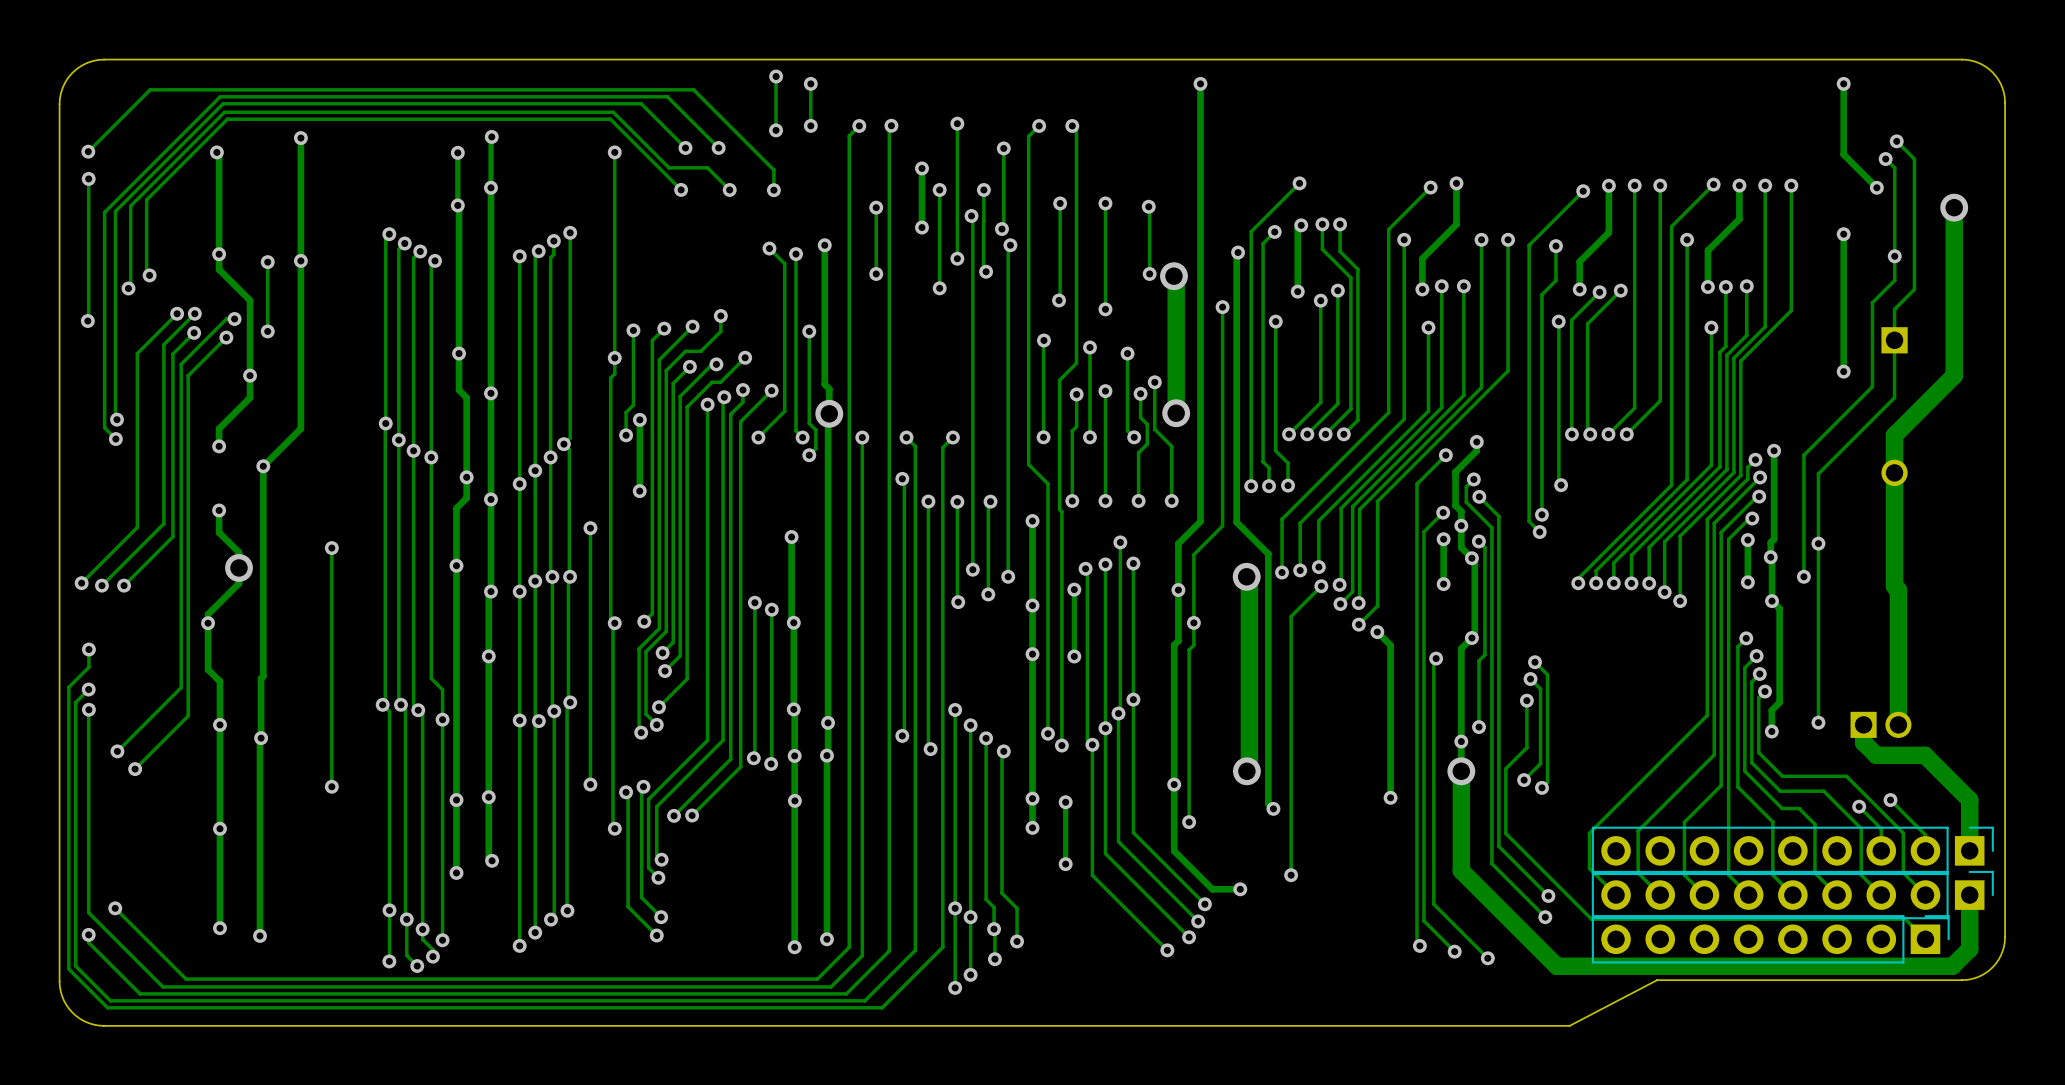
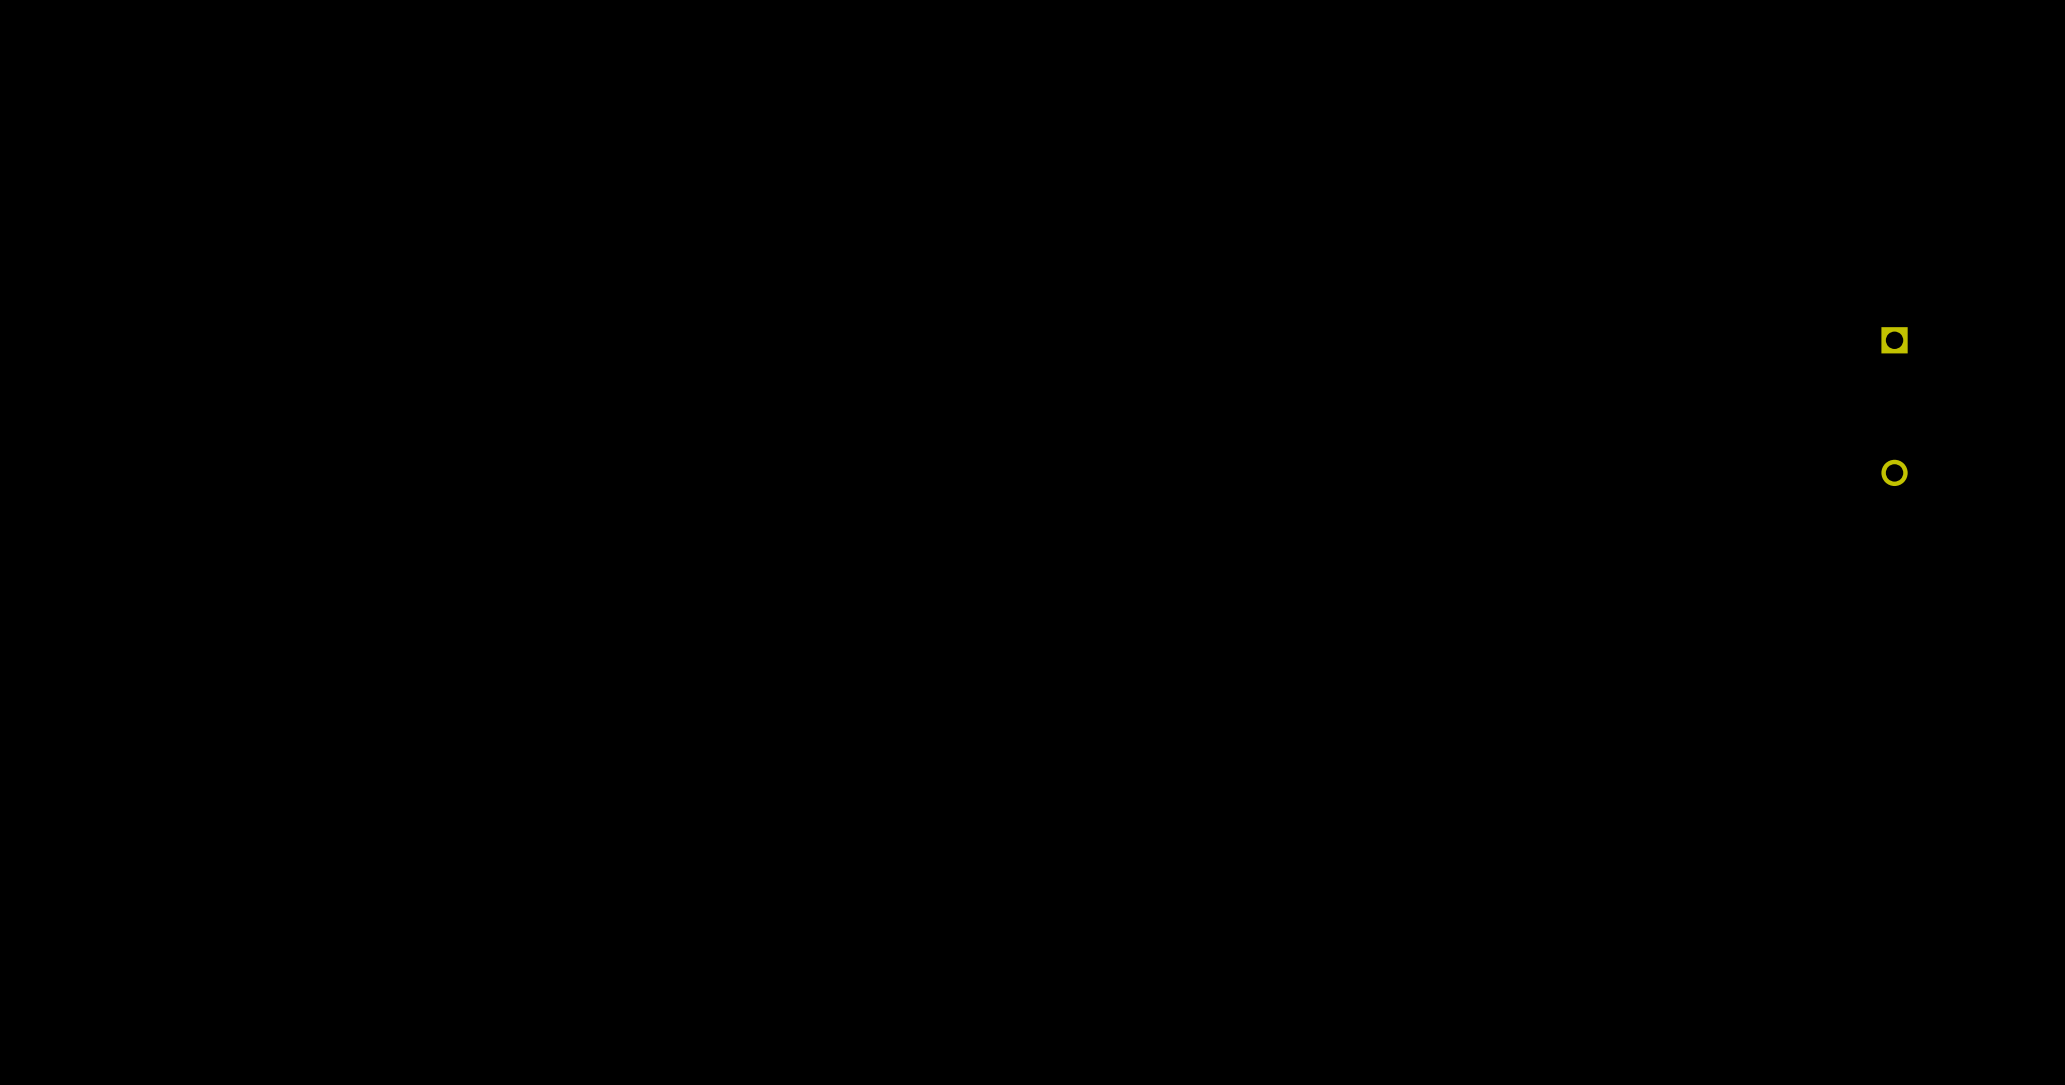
board edge: (1961, 59) (104, 59) (92, 61) (81, 65) (72, 72) (65, 81) (61, 92) (59, 104) (59, 981) (63, 1000) (69, 1009) (80, 1019) (94, 1024) (104, 1025) (1569, 1025) (1657, 980) (1961, 980) (1980, 975) (1988, 970) (1998, 960) (2003, 946) (2005, 937) (2005, 102) (2000, 83) (1992, 72) (1980, 63) (1961, 59) -> none
track: (776, 76) (776, 130) -> none
via: (776, 76) -> none
track: (810, 83) (810, 125) -> none
via: (810, 83) -> none
track: (1200, 83) (1200, 521) (1178, 543) (1178, 640) (1174, 645) (1174, 851) (1212, 889) (1240, 889) -> none
via: (1200, 83) -> none
track: (1843, 83) (1843, 154) (1876, 187) -> none
via: (1843, 83) -> none
track: (957, 123) (957, 258) -> none
via: (957, 123) -> none
via: (810, 125) -> none
track: (859, 125) (849, 136) (849, 947) (817, 979) (185, 979) (115, 908) -> none
via: (859, 125) -> none
track: (891, 125) (889, 127) (889, 951) (846, 993) (139, 993) (88, 942) (88, 934) -> none
via: (891, 125) -> none
track: (1039, 125) (1028, 136) (1028, 464) (1047, 483) (1047, 733) -> none
via: (1039, 125) -> none
track: (1072, 125) (1076, 130) (1076, 363) (1059, 380) (1061, 745) -> none
via: (1072, 125) -> none
via: (776, 130) -> none
track: (491, 136) (488, 857) (492, 860) -> none
via: (491, 136) -> none
track: (300, 138) (300, 428) (263, 466) (260, 935) -> none
via: (300, 138) -> none
track: (1896, 141) (1914, 159) (1914, 289) (1894, 309) (1894, 397) (1818, 473) (1818, 722) -> none
via: (1896, 141) -> none
track: (685, 147) (641, 103) (223, 103) (115, 211) (115, 418) (117, 419) -> none
via: (685, 147) -> none
track: (718, 147) (667, 96) (220, 96) (104, 212) (104, 427) (115, 439) -> none
via: (718, 147) -> none
track: (1003, 148) (1003, 227) (1001, 229) -> none
via: (1003, 148) -> none
track: (88, 151) (150, 89) (693, 89) (773, 170) (773, 190) -> none
via: (88, 151) -> none
track: (216, 152) (219, 154) (219, 269) (250, 300) (250, 397) (219, 428) (219, 446) -> none
via: (216, 152) -> none
track: (457, 152) (459, 390) (466, 397) (466, 498) (456, 508) (456, 872) -> none
via: (457, 152) -> none
track: (614, 152) (614, 373) (610, 377) (610, 619) (614, 623) (613, 624) (613, 826) (614, 828) -> none
via: (614, 152) -> none
track: (1885, 159) (1894, 168) (1894, 280) (1872, 302) (1872, 386) (1803, 455) (1803, 576) -> none
via: (1885, 159) -> none
track: (922, 168) (922, 227) -> none
via: (922, 168) -> none
track: (88, 178) (87, 321) -> none
via: (88, 178) -> none
track: (1299, 183) (1251, 231) (1251, 486) -> none
via: (1299, 183) -> none
track: (1456, 183) (1456, 224) (1422, 258) (1422, 289) -> none
via: (1456, 183) -> none
track: (1713, 184) (1671, 226) (1671, 485) (1578, 578) (1578, 583) -> none
via: (1713, 184) -> none
track: (1608, 185) (1608, 232) (1579, 261) (1579, 289) -> none
via: (1608, 185) -> none
track: (1634, 185) (1634, 408) (1608, 434) -> none
via: (1634, 185) -> none
track: (1660, 185) (1660, 400) (1626, 434) -> none
via: (1660, 185) -> none
track: (1739, 185) (1739, 219) (1707, 250) (1707, 287) -> none
via: (1739, 185) -> none
track: (1765, 185) (1765, 326) (1733, 358) (1733, 472) (1664, 541) (1664, 592) -> none
via: (1765, 185) -> none
track: (1791, 185) (1791, 310) (1740, 361) (1740, 475) (1680, 536) (1680, 601) -> none
via: (1791, 185) -> none
via: (490, 187) -> none
track: (1430, 187) (1388, 229) (1388, 412) (1282, 519) (1282, 572) -> none
via: (1430, 187) -> none
via: (1876, 187) -> none
track: (681, 189) (610, 119) (227, 119) (146, 199) (146, 272) (149, 275) -> none
via: (681, 189) -> none
track: (729, 189) (707, 167) (668, 167) (613, 112) (224, 112) (130, 206) (130, 286) (128, 288) -> none
via: (729, 189) -> none
track: (939, 189) (939, 288) -> none
via: (939, 189) -> none
track: (983, 189) (983, 269) (986, 271) -> none
via: (983, 189) -> none
via: (773, 190) -> none
track: (1583, 191) (1529, 245) (1529, 521) (1539, 532) -> none
via: (1583, 191) -> none
track: (1060, 203) (1059, 300) -> none
via: (1060, 203) -> none
track: (1105, 203) (1105, 309) -> none
via: (1105, 203) -> none
via: (457, 205) -> none
track: (1148, 206) (1149, 273) -> none
via: (1148, 206) -> none
track: (876, 207) (876, 273) -> none
via: (876, 207) -> none
track: (1954, 207) (1954, 375) (1894, 435) (1894, 586) (1898, 590) (1898, 724) -> none
via: (1954, 207) -> none
track: (971, 215) (972, 569) -> none
via: (971, 215) -> none
track: (1322, 224) (1322, 249) (1350, 277) (1350, 408) (1325, 434) -> none
via: (1322, 224) -> none
track: (1340, 224) (1340, 251) (1357, 269) (1357, 420) (1343, 434) -> none
via: (1340, 224) -> none
track: (1301, 225) (1297, 228) (1297, 291) -> none
via: (1301, 225) -> none
via: (922, 227) -> none
via: (1001, 229) -> none
track: (1274, 231) (1263, 243) (1263, 461) (1269, 467) (1269, 486) -> none
via: (1274, 231) -> none
track: (570, 232) (570, 437) (563, 444) (569, 449) (568, 700) (570, 702) (567, 705) (567, 910) -> none
via: (570, 232) -> none
track: (389, 234) (385, 237) (385, 702) (382, 704) (389, 711) (389, 961) -> none
via: (389, 234) -> none
track: (1843, 234) (1843, 371) -> none
via: (1843, 234) -> none
track: (1404, 239) (1404, 419) (1300, 523) (1300, 570) -> none
via: (1404, 239) -> none
track: (1481, 239) (1481, 387) (1359, 509) (1358, 603) -> none
via: (1481, 239) -> none
track: (1508, 239) (1508, 370) (1377, 501) (1377, 605) (1358, 624) -> none
via: (1508, 239) -> none
track: (1687, 239) (1687, 479) (1596, 570) (1596, 583) -> none
via: (1687, 239) -> none
track: (553, 241) (553, 254) (550, 257) (550, 575) (552, 576) (552, 709) (554, 711) (554, 916) (550, 919) -> none
via: (553, 241) -> none
track: (404, 243) (398, 249) (398, 702) (405, 709) (406, 955) (417, 966) -> none
via: (404, 243) -> none
track: (824, 245) (824, 384) (829, 389) (826, 939) -> none
via: (824, 245) -> none
track: (1010, 245) (1008, 247) (1008, 576) -> none
via: (1010, 245) -> none
track: (1555, 246) (1555, 280) (1541, 294) (1541, 514) -> none
via: (1555, 246) -> none
track: (769, 248) (784, 263) (784, 411) (758, 437) -> none
via: (769, 248) -> none
track: (420, 251) (413, 258) (413, 705) (422, 714) (422, 939) (432, 949) (432, 956) -> none
via: (420, 251) -> none
track: (538, 251) (535, 254) (535, 717) (538, 721) (535, 724) (535, 932) -> none
via: (538, 251) -> none
track: (1238, 252) (1236, 522) (1268, 553) (1268, 803) (1273, 808) -> none
via: (1238, 252) -> none
via: (219, 254) -> none
track: (796, 254) (796, 430) (802, 437) -> none
via: (796, 254) -> none
track: (519, 256) (519, 945) -> none
via: (519, 256) -> none
via: (1894, 256) -> none
via: (957, 258) -> none
via: (300, 260) -> none
track: (435, 260) (431, 264) (431, 678) (442, 689) (442, 719) -> none
via: (435, 260) -> none
track: (267, 262) (267, 331) -> none
via: (267, 262) -> none
via: (986, 271) -> none
via: (876, 273) -> none
via: (1149, 273) -> none
via: (149, 275) -> none
track: (1173, 276) (1176, 278) (1176, 413) -> none
via: (1173, 276) -> none
track: (1441, 286) (1441, 407) (1341, 508) (1341, 583) (1339, 584) -> none
via: (1441, 286) -> none
track: (1463, 286) (1463, 395) (1352, 506) (1352, 591) (1340, 604) -> none
via: (1463, 286) -> none
track: (1746, 286) (1746, 335) (1726, 355) (1726, 469) (1649, 547) (1649, 583) -> none
via: (1746, 286) -> none
via: (1707, 287) -> none
track: (1725, 287) (1725, 346) (1719, 352) (1719, 466) (1631, 555) (1631, 583) -> none
via: (1725, 287) -> none
via: (128, 288) -> none
via: (939, 288) -> none
via: (1422, 289) -> none
via: (1579, 289) -> none
track: (1337, 290) (1337, 403) (1307, 434) -> none
via: (1337, 290) -> none
track: (1620, 290) (1587, 323) (1587, 431) (1590, 434) -> none
via: (1620, 290) -> none
via: (1297, 291) -> none
track: (1599, 292) (1571, 320) (1571, 434) -> none
via: (1599, 292) -> none
via: (1059, 300) -> none
track: (1320, 300) (1320, 402) (1289, 434) -> none
via: (1320, 300) -> none
track: (1222, 307) (1222, 525) (1193, 554) (1193, 645) (1189, 650) (1189, 822) -> none
via: (1222, 307) -> none
via: (1105, 309) -> none
track: (177, 313) (137, 353) (137, 527) (81, 583) -> none
via: (177, 313) -> none
track: (194, 313) (163, 344) (163, 523) (101, 585) -> none
via: (194, 313) -> none
track: (720, 315) (720, 331) (700, 351) (685, 351) (666, 370) (666, 631) (646, 651) (646, 714) (656, 724) -> none
via: (720, 315) -> none
track: (234, 319) (226, 319) (181, 364) (181, 687) (117, 751) -> none
via: (234, 319) -> none
via: (87, 321) -> none
track: (1275, 321) (1275, 450) (1288, 463) (1288, 485) -> none
via: (1275, 321) -> none
track: (1558, 321) (1558, 482) (1561, 485) -> none
via: (1558, 321) -> none
track: (692, 326) (659, 359) (659, 628) (639, 648) (639, 730) (641, 732) -> none
via: (692, 326) -> none
track: (1428, 327) (1428, 411) (1318, 520) (1318, 567) -> none
via: (1428, 327) -> none
track: (1711, 327) (1711, 465) (1613, 562) (1613, 583) -> none
via: (1711, 327) -> none
track: (664, 328) (652, 340) (652, 613) (644, 621) -> none
via: (664, 328) -> none
track: (633, 330) (633, 405) (626, 412) (626, 435) -> none
via: (633, 330) -> none
via: (267, 331) -> none
track: (809, 331) (809, 423) (815, 430) (815, 448) (809, 455) -> none
via: (809, 331) -> none
track: (194, 332) (172, 354) (172, 536) (124, 585) -> none
via: (194, 332) -> none
track: (226, 337) (188, 375) (188, 716) (135, 769) -> none
via: (226, 337) -> none
track: (1043, 340) (1043, 437) -> none
via: (1043, 340) -> none
track: (1089, 347) (1089, 437) -> none
via: (1089, 347) -> none
via: (459, 353) -> none
track: (1127, 353) (1127, 430) (1134, 437) -> none
via: (1127, 353) -> none
via: (614, 357) -> none
track: (745, 357) (720, 382) (712, 382) (687, 407) (687, 679) (658, 707) -> none
via: (745, 357) -> none
track: (716, 364) (712, 364) (680, 396) (680, 655) (665, 671) -> none
via: (716, 364) -> none
track: (689, 366) (673, 383) (673, 642) (662, 652) -> none
via: (689, 366) -> none
via: (1843, 371) -> none
via: (250, 375) -> none
track: (1154, 382) (1154, 429) (1171, 446) (1171, 501) -> none
via: (1154, 382) -> none
track: (742, 390) (742, 402) (730, 414) (730, 759) (674, 815) -> none
via: (742, 390) -> none
track: (771, 390) (740, 421) (740, 766) (692, 815) -> none
via: (771, 390) -> none
track: (1105, 391) (1105, 501) -> none
via: (1105, 391) -> none
via: (490, 393) -> none
track: (1140, 393) (1140, 417) (1147, 424) (1147, 444) (1138, 452) (1138, 501) -> none
via: (1140, 393) -> none
track: (1076, 394) (1076, 426) (1072, 430) (1072, 501) -> none
via: (1076, 394) -> none
track: (724, 397) (723, 740) (656, 806) (656, 854) (661, 859) -> none
via: (724, 397) -> none
track: (707, 404) (707, 740) (648, 799) (648, 867) (658, 877) -> none
via: (707, 404) -> none
via: (829, 413) -> none
via: (1176, 413) -> none
via: (117, 419) -> none
track: (639, 419) (639, 490) -> none
via: (639, 419) -> none
via: (385, 423) -> none
via: (1289, 434) -> none
via: (1307, 434) -> none
via: (1325, 434) -> none
via: (1343, 434) -> none
via: (1571, 434) -> none
via: (1590, 434) -> none
via: (1608, 434) -> none
via: (1626, 434) -> none
via: (626, 435) -> none
via: (758, 437) -> none
via: (802, 437) -> none
track: (862, 437) (862, 955) (831, 986) (162, 986) (88, 912) (88, 709) -> none
via: (862, 437) -> none
track: (906, 437) (915, 446) (915, 950) (864, 1000) (110, 1000) (75, 966) (75, 702) (88, 689) -> none
via: (906, 437) -> none
track: (952, 437) (942, 447) (942, 947) (882, 1007) (107, 1007) (68, 969) (68, 687) (88, 667) (88, 649) -> none
via: (952, 437) -> none
via: (1043, 437) -> none
via: (1089, 437) -> none
via: (1134, 437) -> none
via: (115, 439) -> none
via: (398, 440) -> none
track: (1476, 441) (1476, 450) (1455, 472) (1455, 505) (1461, 511) (1461, 547) (1474, 561) (1474, 635) (1461, 648) (1461, 870) (1556, 966) (1952, 966) (1969, 949) (1969, 895) -> none
via: (1476, 441) -> none
via: (563, 444) -> none
via: (219, 446) -> none
via: (413, 450) -> none
track: (1774, 450) (1774, 539) (1770, 542) (1770, 557) (1772, 601) (1779, 608) (1779, 702) (1771, 710) (1771, 731) -> none
via: (1774, 450) -> none
via: (809, 455) -> none
track: (1445, 455) (1416, 484) (1416, 943) (1419, 945) -> none
via: (1445, 455) -> none
via: (431, 457) -> none
via: (550, 457) -> none
track: (1755, 459) (1747, 467) (1747, 478) (1707, 519) (1707, 715) (1589, 833) (1589, 868) (1616, 895) -> none
via: (1755, 459) -> none
via: (263, 466) -> none
via: (535, 470) -> none
via: (466, 477) -> none
track: (1760, 477) (1714, 523) (1714, 754) (1638, 830) (1638, 872) (1660, 895) -> none
via: (1760, 477) -> none
track: (902, 478) (904, 480) (904, 733) (902, 735) -> none
via: (902, 478) -> none
track: (1473, 479) (1466, 486) (1466, 502) (1491, 527) (1491, 863) (1545, 917) -> none
via: (1473, 479) -> none
via: (519, 483) -> none
via: (1288, 485) -> none
via: (1561, 485) -> none
via: (1251, 486) -> none
via: (1269, 486) -> none
via: (639, 491) -> none
track: (1479, 496) (1498, 516) (1498, 846) (1548, 895) -> none
via: (1479, 496) -> none
track: (1759, 496) (1757, 496) (1721, 532) (1721, 785) (1684, 822) (1684, 875) (1704, 895) -> none
via: (1759, 496) -> none
via: (490, 499) -> none
track: (928, 501) (928, 746) (930, 749) -> none
via: (928, 501) -> none
track: (957, 501) (958, 602) -> none
via: (957, 501) -> none
track: (990, 501) (988, 503) (988, 594) -> none
via: (990, 501) -> none
via: (1072, 501) -> none
via: (1105, 501) -> none
via: (1138, 501) -> none
via: (1171, 501) -> none
track: (219, 510) (219, 532) (239, 552) (239, 583) (208, 614) (208, 669) (219, 681) (219, 928) -> none
via: (219, 510) -> none
track: (1443, 512) (1423, 531) (1423, 920) (1454, 951) -> none
via: (1443, 512) -> none
via: (1541, 514) -> none
track: (1752, 518) (1749, 518) (1728, 539) (1728, 875) (1748, 895) -> none
via: (1752, 518) -> none
track: (1032, 521) (1032, 827) -> none
via: (1032, 521) -> none
via: (1461, 525) -> none
track: (590, 528) (590, 784) -> none
via: (590, 528) -> none
via: (1539, 532) -> none
track: (791, 537) (794, 800) -> none
via: (791, 537) -> none
track: (1443, 539) (1443, 584) -> none
via: (1443, 539) -> none
track: (1747, 540) (1747, 582) -> none
via: (1747, 540) -> none
track: (1478, 541) (1484, 547) (1484, 654) (1479, 660) (1479, 727) -> none
via: (1478, 541) -> none
track: (1120, 542) (1118, 841) (1198, 921) -> none
via: (1120, 542) -> none
via: (1818, 543) -> none
track: (331, 548) (331, 786) -> none
via: (331, 548) -> none
via: (1770, 557) -> none
via: (1471, 558) -> none
track: (1133, 563) (1133, 832) (1204, 904) -> none
via: (1133, 563) -> none
track: (1105, 564) (1105, 853) (1189, 937) -> none
via: (1105, 564) -> none
via: (456, 565) -> none
via: (239, 567) -> none
via: (1318, 567) -> none
track: (1085, 568) (1087, 570) (1087, 739) (1092, 744) (1092, 875) (1167, 950) -> none
via: (1085, 568) -> none
via: (972, 569) -> none
via: (1300, 570) -> none
via: (1282, 572) -> none
via: (552, 576) -> none
via: (570, 576) -> none
via: (1008, 576) -> none
track: (1246, 576) (1249, 579) (1249, 768) (1246, 771) -> none
via: (1246, 576) -> none
via: (1803, 576) -> none
via: (535, 581) -> none
via: (1747, 582) -> none
via: (81, 583) -> none
via: (1578, 583) -> none
via: (1596, 583) -> none
via: (1613, 583) -> none
via: (1631, 583) -> none
via: (1649, 583) -> none
via: (1339, 584) -> none
via: (1443, 584) -> none
via: (101, 585) -> none
via: (124, 585) -> none
track: (1321, 586) (1291, 616) (1291, 875) -> none
via: (1321, 586) -> none
track: (1074, 589) (1074, 656) -> none
via: (1074, 589) -> none
via: (1178, 590) -> none
via: (490, 591) -> none
via: (519, 591) -> none
via: (1664, 592) -> none
via: (988, 594) -> none
via: (1680, 601) -> none
via: (1772, 601) -> none
track: (754, 602) (753, 758) -> none
via: (754, 602) -> none
via: (958, 602) -> none
via: (1358, 603) -> none
via: (1340, 604) -> none
via: (1032, 605) -> none
track: (771, 609) (771, 763) -> none
via: (771, 609) -> none
via: (644, 621) -> none
via: (793, 622) -> none
via: (1193, 622) -> none
via: (208, 623) -> none
via: (614, 623) -> none
via: (1358, 624) -> none
track: (1377, 632) (1390, 645) (1390, 797) -> none
via: (1377, 632) -> none
via: (1471, 638) -> none
track: (1746, 638) (1737, 646) (1737, 787) (1772, 822) (1772, 875) (1792, 895) -> none
via: (1746, 638) -> none
via: (88, 649) -> none
via: (662, 652) -> none
via: (1032, 654) -> none
via: (488, 656) -> none
via: (1074, 656) -> none
track: (1756, 656) (1744, 667) (1744, 771) (1782, 808) (1799, 808) (1814, 824) (1814, 872) (1837, 895) -> none
via: (1756, 656) -> none
track: (1436, 658) (1433, 660) (1433, 904) (1487, 958) -> none
via: (1436, 658) -> none
track: (1535, 662) (1547, 674) (1547, 782) (1541, 787) -> none
via: (1535, 662) -> none
via: (665, 671) -> none
track: (1759, 674) (1751, 682) (1751, 762) (1780, 791) (1823, 791) (1861, 828) (1861, 875) (1881, 895) -> none
via: (1759, 674) -> none
track: (1530, 679) (1540, 689) (1540, 763) (1524, 780) -> none
via: (1530, 679) -> none
via: (88, 689) -> none
track: (1764, 691) (1758, 697) (1758, 752) (1782, 776) (1846, 776) (1903, 833) (1903, 872) (1925, 895) -> none
via: (1764, 691) -> none
via: (1133, 699) -> none
track: (1526, 700) (1526, 747) (1505, 768) (1505, 833) (1591, 919) (1905, 919) (1925, 939) -> none
via: (1526, 700) -> none
via: (570, 702) -> none
via: (382, 704) -> none
via: (400, 704) -> none
via: (658, 707) -> none
via: (88, 709) -> none
via: (793, 709) -> none
track: (955, 709) (955, 987) -> none
via: (955, 709) -> none
via: (418, 710) -> none
via: (554, 711) -> none
via: (1118, 713) -> none
track: (442, 719) (442, 940) -> none
via: (442, 719) -> none
via: (519, 720) -> none
via: (538, 721) -> none
via: (828, 722) -> none
via: (1818, 722) -> none
via: (219, 724) -> none
via: (656, 724) -> none
track: (1863, 724) (1863, 742) (1876, 755) (1925, 755) (1969, 800) (1969, 850) -> none
part: (1881, 724) -> none
track: (970, 725) (970, 974) -> none
via: (970, 725) -> none
via: (1479, 727) -> none
via: (1105, 728) -> none
via: (1771, 731) -> none
via: (641, 732) -> none
via: (1047, 733) -> none
via: (902, 735) -> none
via: (261, 738) -> none
track: (986, 738) (986, 899) (994, 907) (994, 959) -> none
via: (986, 738) -> none
via: (1461, 741) -> none
via: (1092, 744) -> none
via: (1061, 745) -> none
via: (930, 749) -> none
via: (117, 751) -> none
track: (1003, 751) (1001, 753) (1001, 893) (1017, 908) (1017, 941) -> none
via: (1003, 751) -> none
via: (794, 755) -> none
via: (826, 755) -> none
via: (753, 758) -> none
via: (771, 763) -> none
via: (135, 769) -> none
via: (1246, 771) -> none
via: (1461, 771) -> none
via: (1524, 780) -> none
via: (590, 784) -> none
via: (1174, 784) -> none
via: (331, 786) -> none
track: (643, 786) (641, 788) (641, 897) (661, 917) -> none
via: (643, 786) -> none
via: (1541, 787) -> none
track: (626, 792) (628, 794) (628, 906) (656, 935) -> none
via: (626, 792) -> none
via: (488, 797) -> none
via: (1390, 797) -> none
via: (1032, 798) -> none
via: (456, 800) -> none
via: (794, 800) -> none
track: (1890, 800) (1925, 835) (1925, 850) -> none
via: (1890, 800) -> none
track: (794, 801) (794, 947) -> none
track: (1065, 802) (1065, 864) -> none
via: (1065, 802) -> none
track: (1859, 806) (1881, 828) (1881, 850) -> none
via: (1859, 806) -> none
via: (1273, 808) -> none
via: (674, 815) -> none
via: (692, 815) -> none
via: (1189, 822) -> none
via: (1032, 827) -> none
via: (219, 828) -> none
via: (614, 828) -> none
part: (1792, 850) -> none
via: (661, 859) -> none
via: (492, 860) -> none
via: (1065, 864) -> none
via: (456, 872) -> none
via: (1291, 875) -> none
via: (658, 877) -> none
via: (1240, 889) -> none
via: (1548, 895) -> none
part: (1792, 895) -> none
via: (1204, 904) -> none
via: (115, 908) -> none
via: (955, 908) -> none
via: (389, 910) -> none
via: (567, 910) -> none
via: (661, 917) -> none
via: (970, 917) -> none
via: (1545, 917) -> none
via: (406, 919) -> none
via: (550, 919) -> none
via: (1198, 921) -> none
via: (219, 928) -> none
via: (422, 929) -> none
via: (994, 929) -> none
via: (535, 932) -> none
via: (88, 934) -> none
via: (260, 935) -> none
via: (656, 935) -> none
via: (1189, 937) -> none
via: (826, 939) -> none
part: (1770, 939) -> none
via: (442, 940) -> none
via: (1017, 941) -> none
via: (519, 945) -> none
via: (1419, 945) -> none
via: (794, 947) -> none
via: (1167, 950) -> none
via: (1454, 951) -> none
via: (432, 956) -> none
via: (1487, 958) -> none
via: (994, 959) -> none
via: (389, 961) -> none
via: (417, 966) -> none
via: (970, 974) -> none
via: (955, 987) -> none

